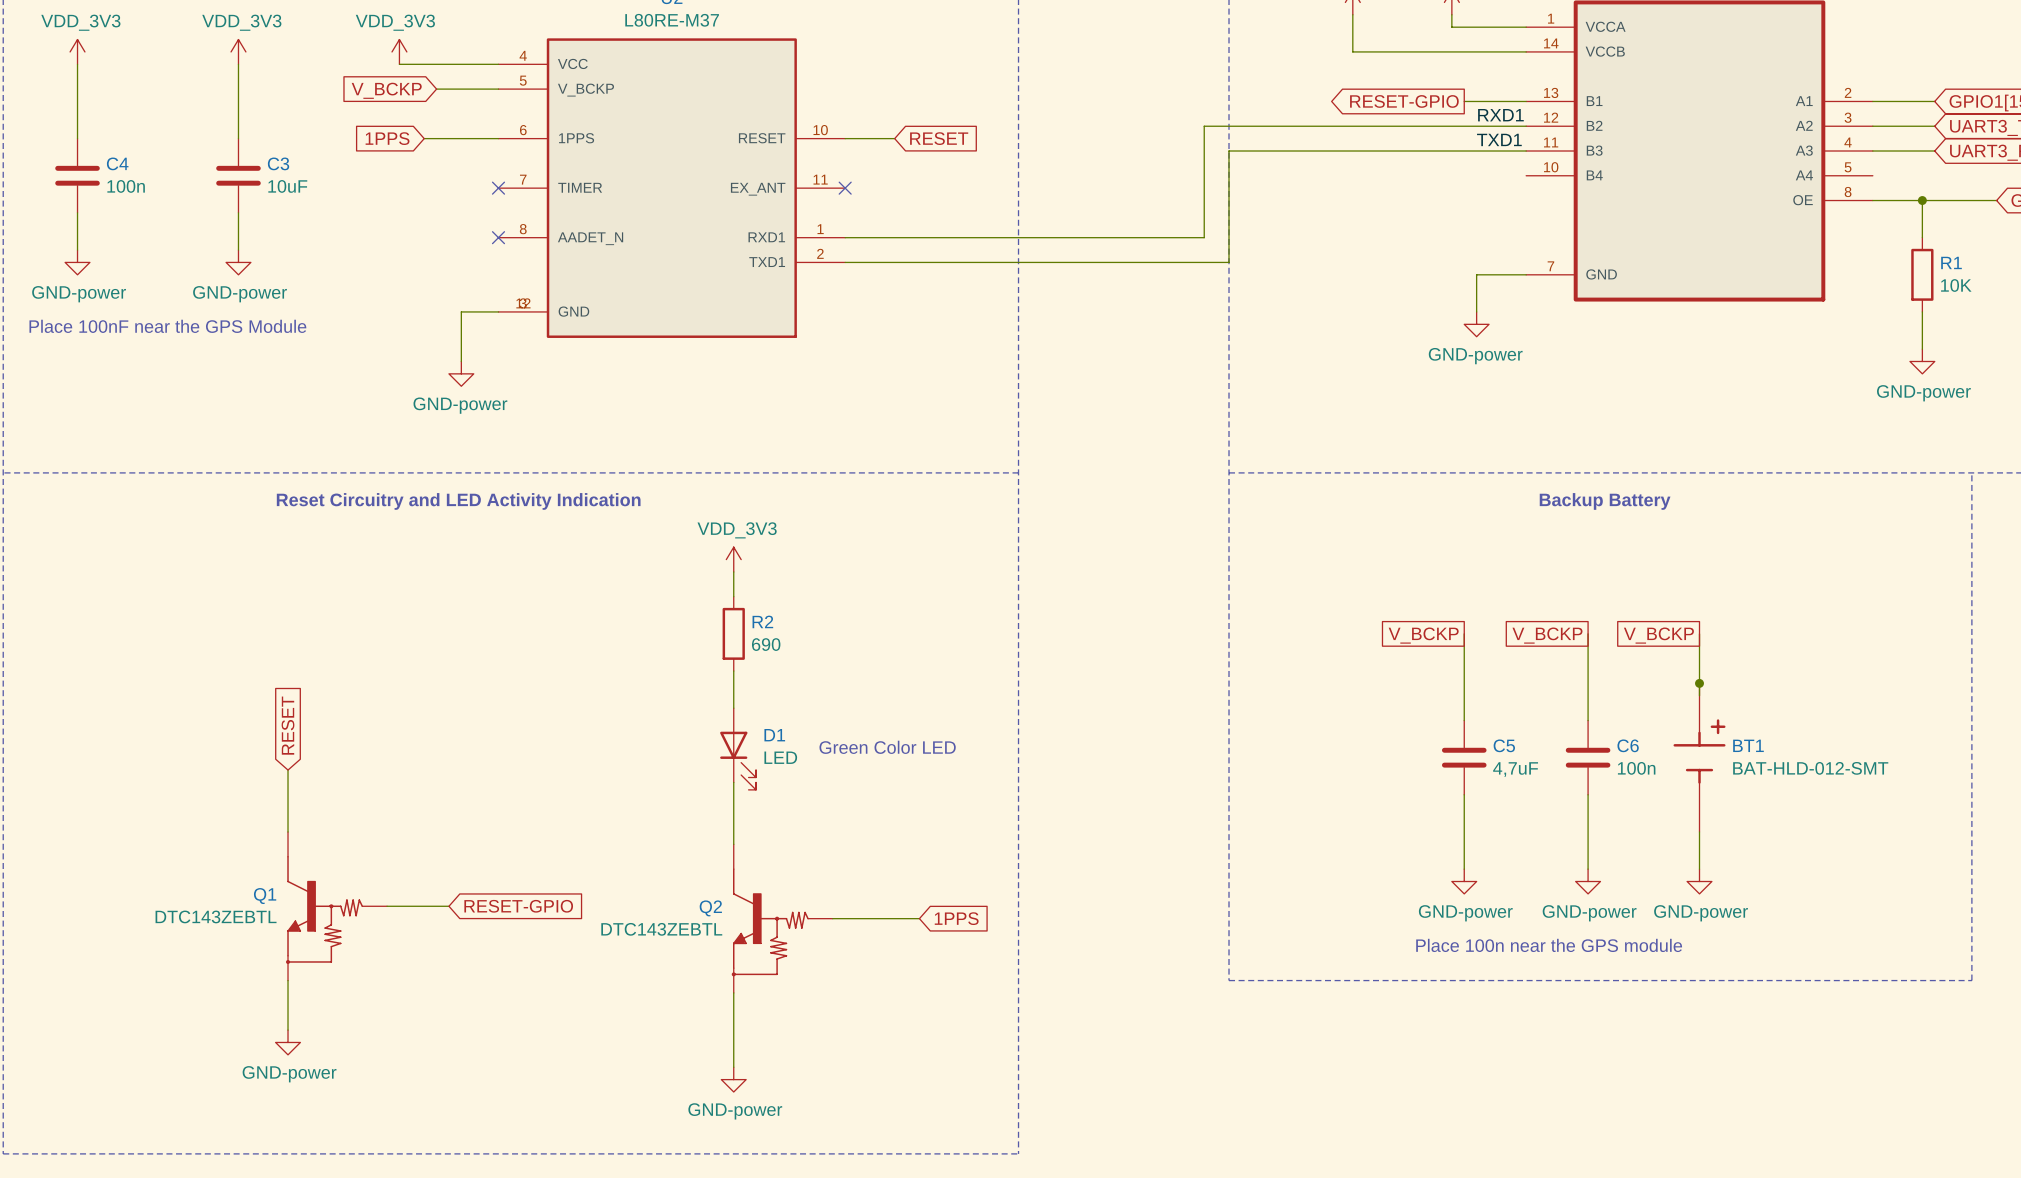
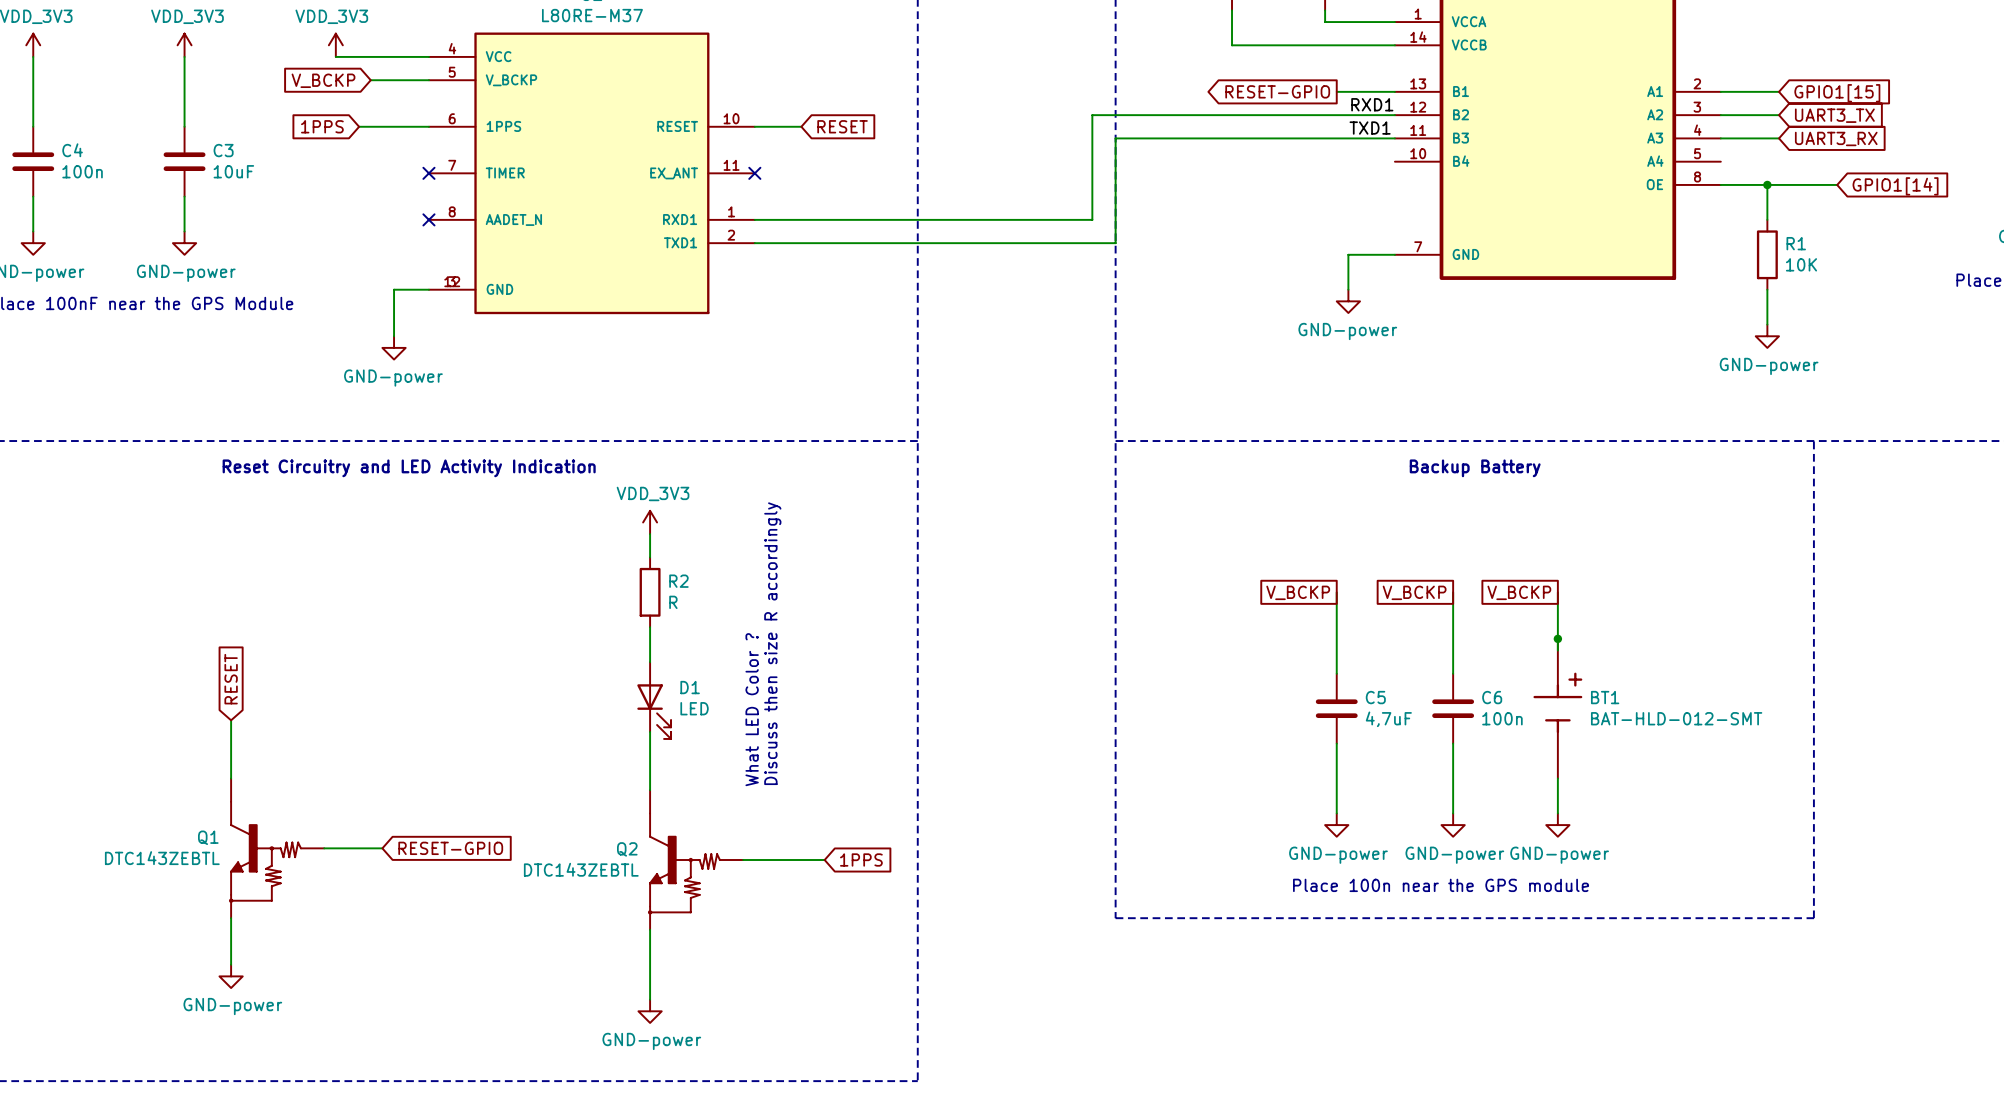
R2 value: 690 (766, 644) -> R (673, 602)
text: none -> Discuss then size R accordingly (772, 643)
text: Green Color LED (887, 747) -> none
text: none -> What LED Color ? (752, 709)

